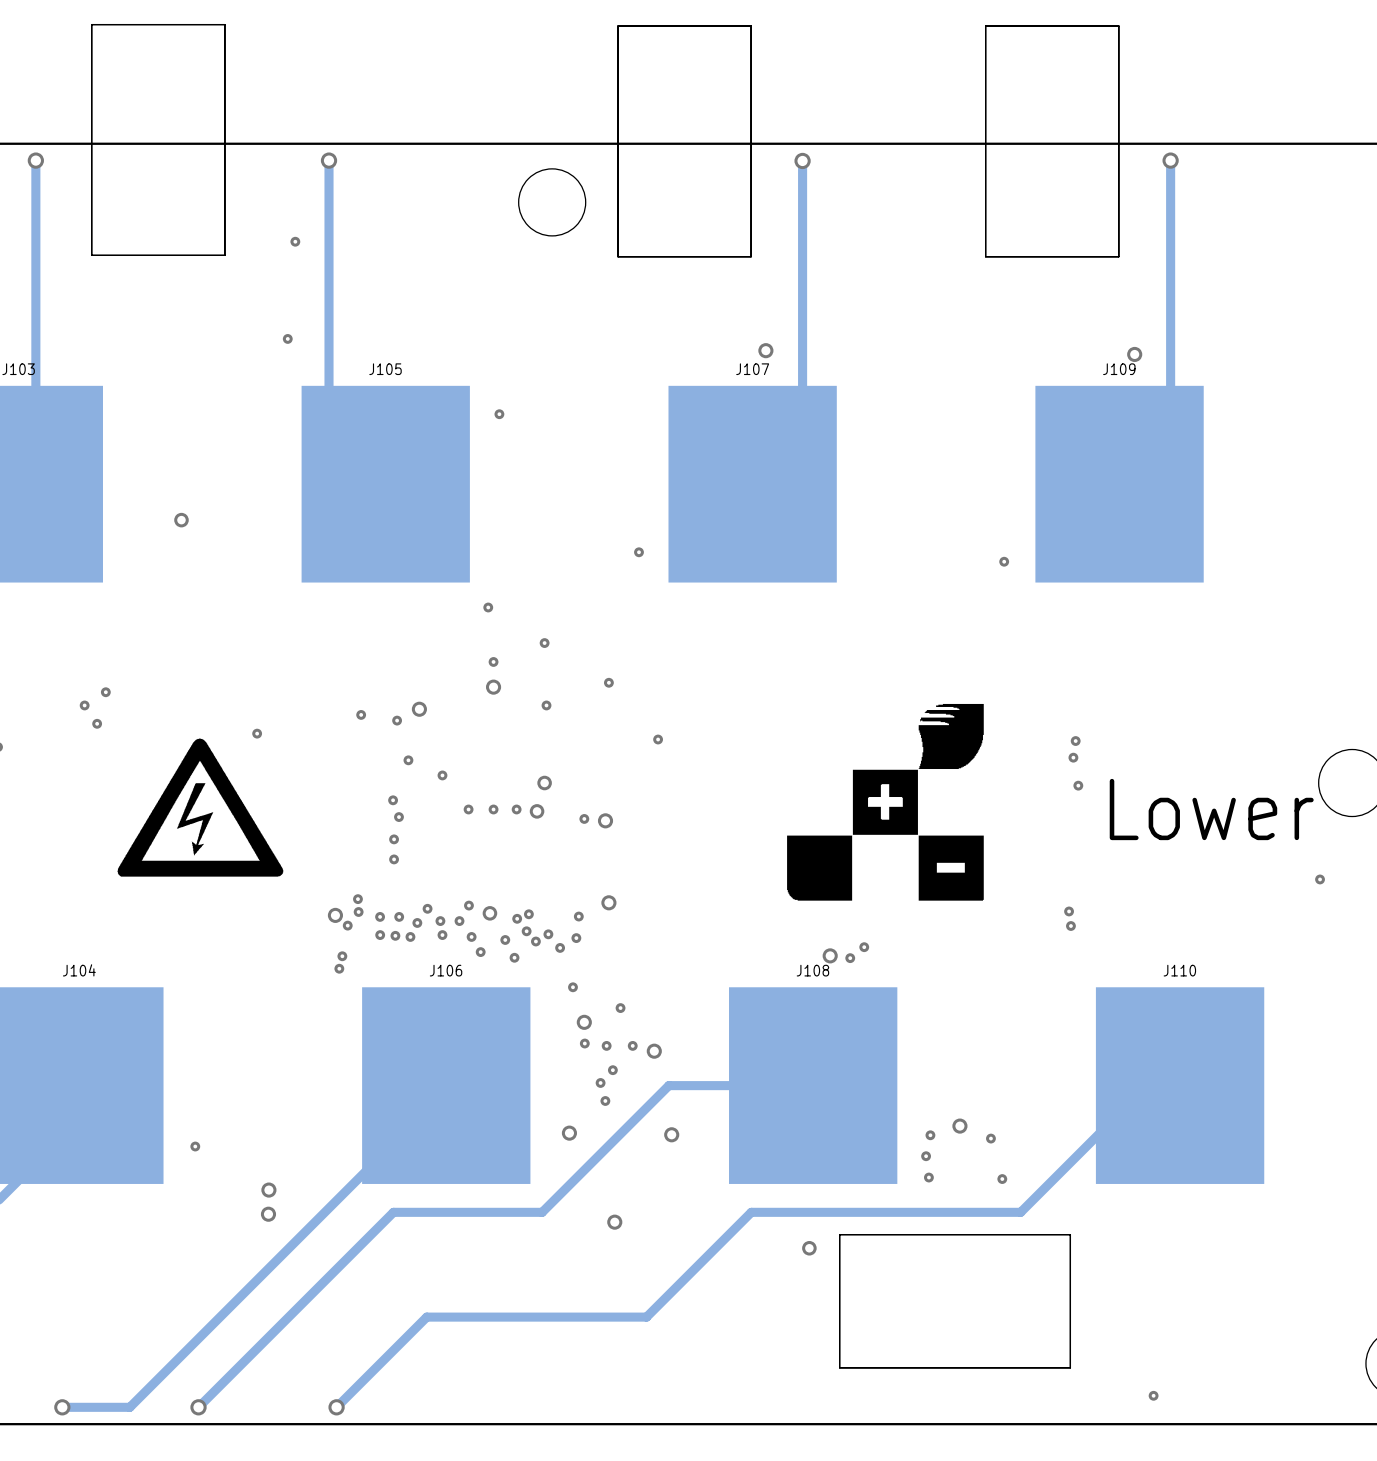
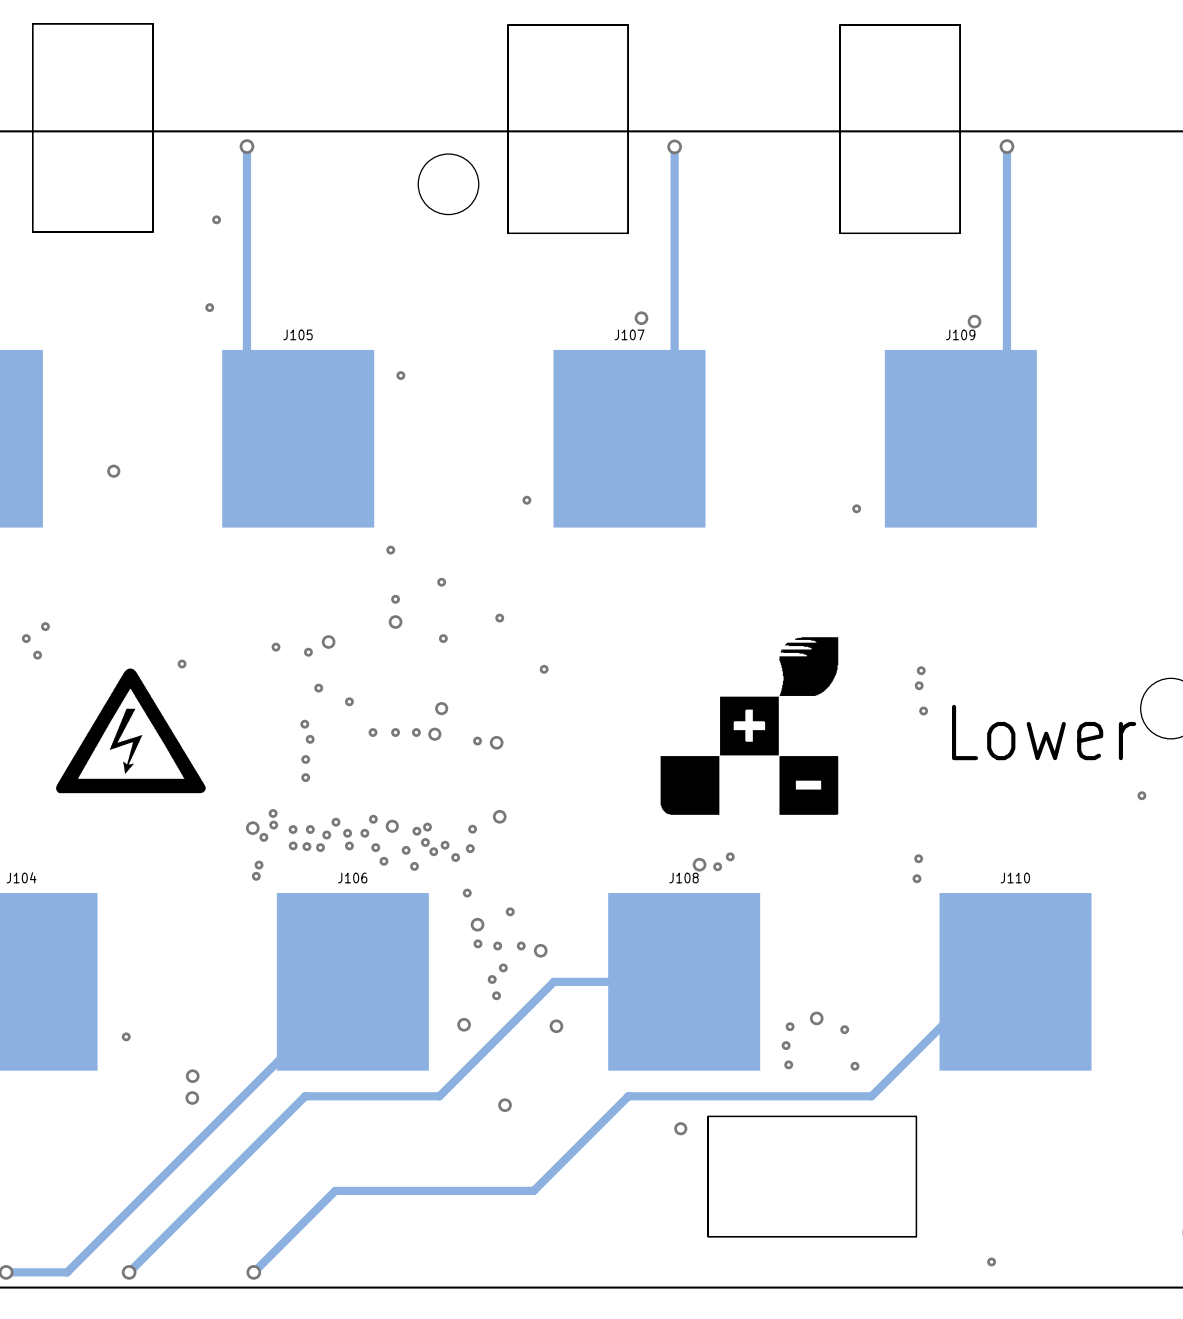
via: (1069, 911) -> none
via: (1070, 926) -> none
via: none -> (918, 858)
via: none -> (916, 878)

